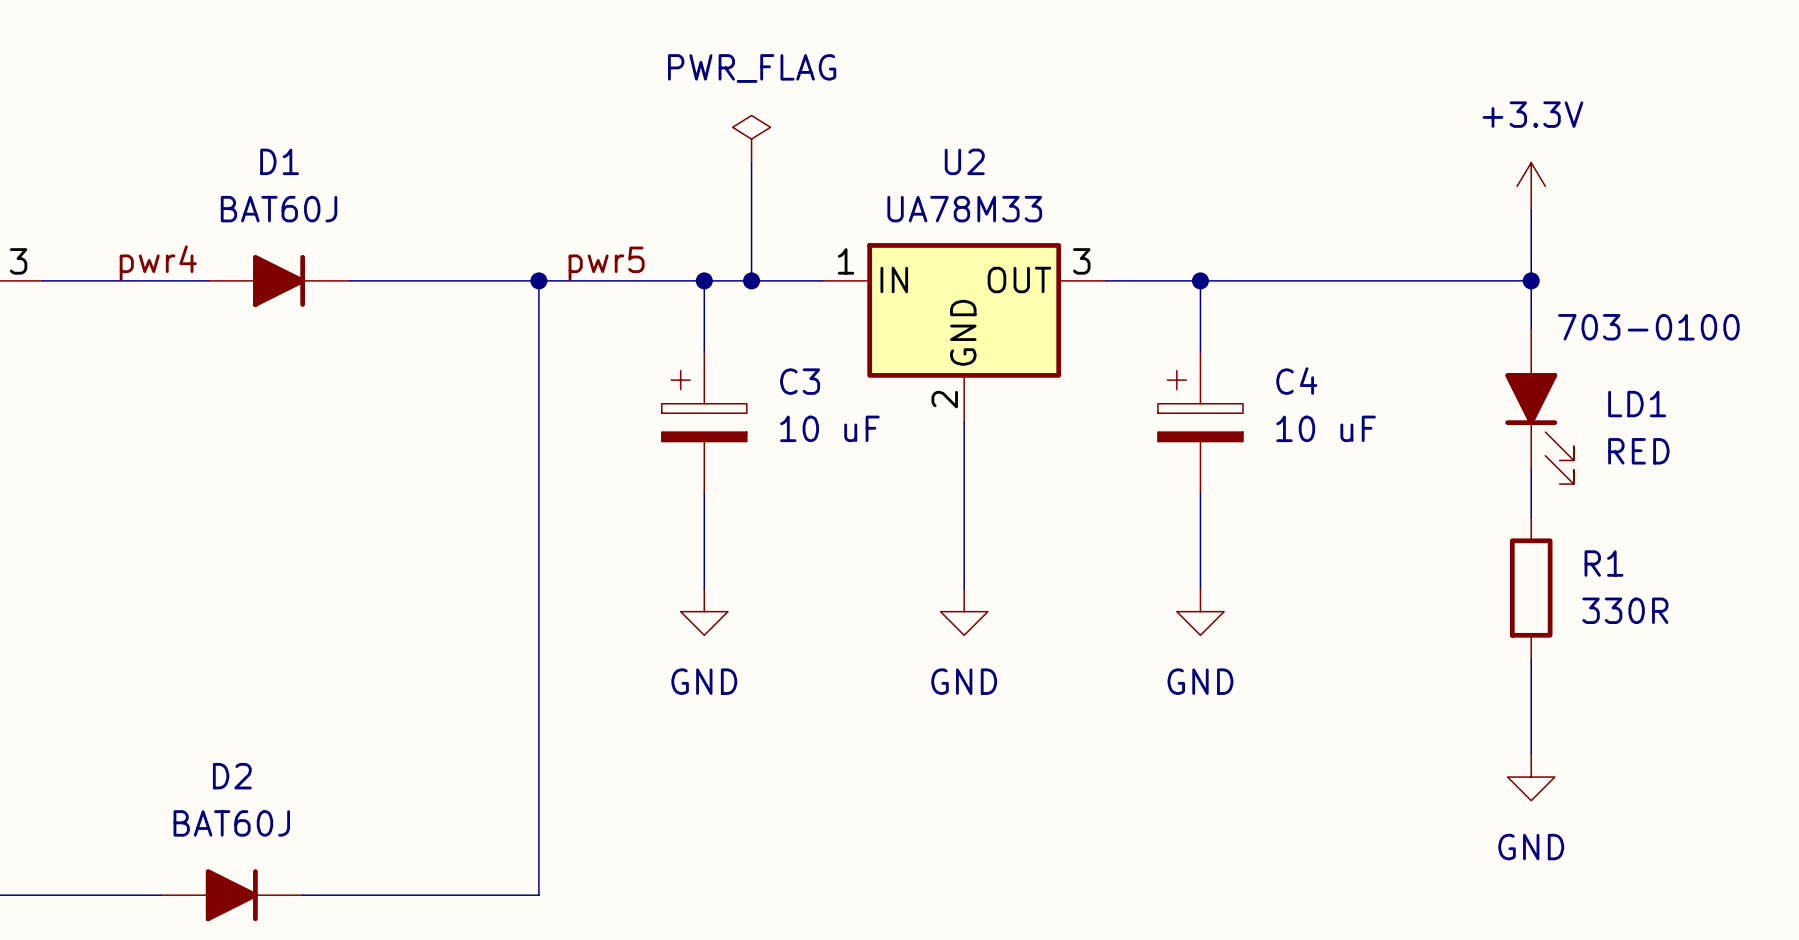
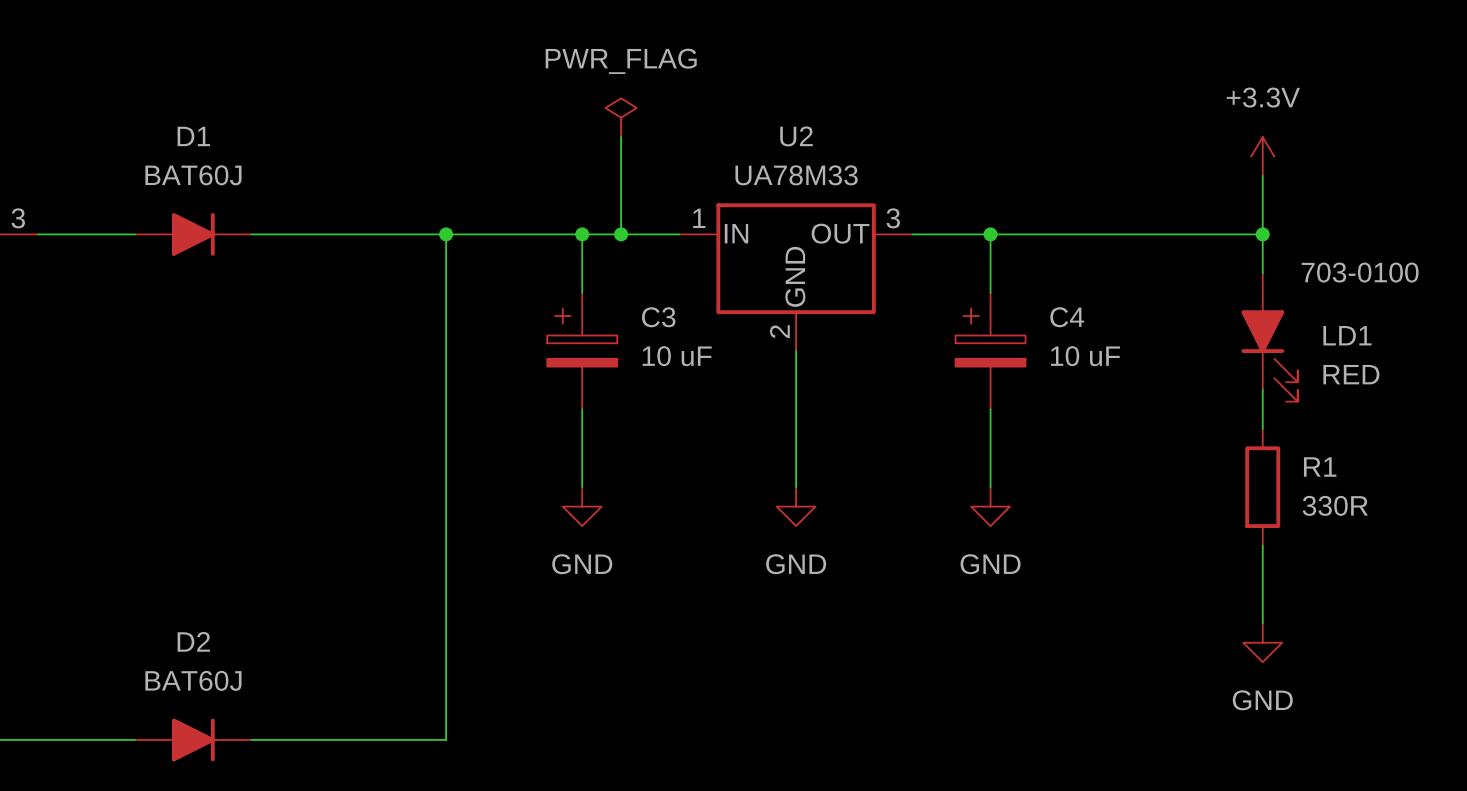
label: pwr4 (158, 263) -> none
label: pwr5 (606, 263) -> none
D1 position: (279, 280) -> (193, 234)

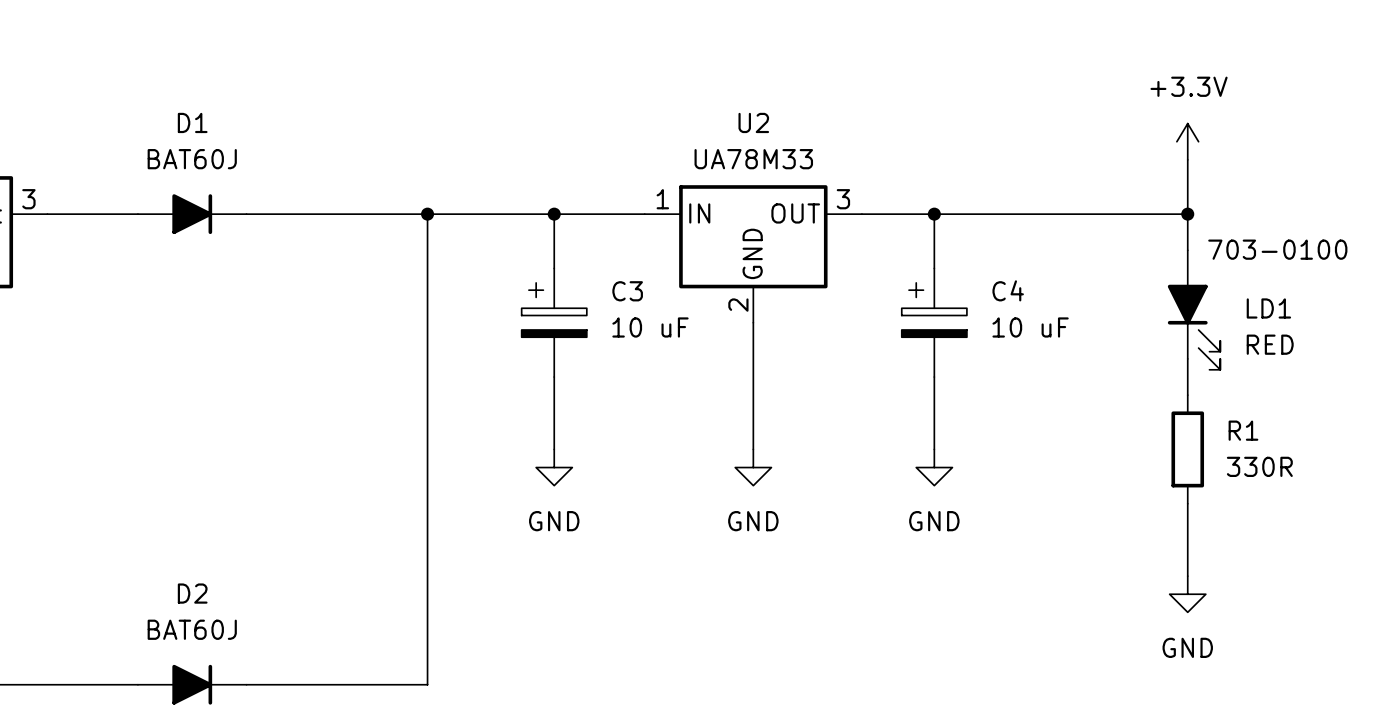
power symbol: PWR_FLAG (621, 117) -> none
wire: (621, 137) (621, 234) -> none
junction: (621, 234) -> none

